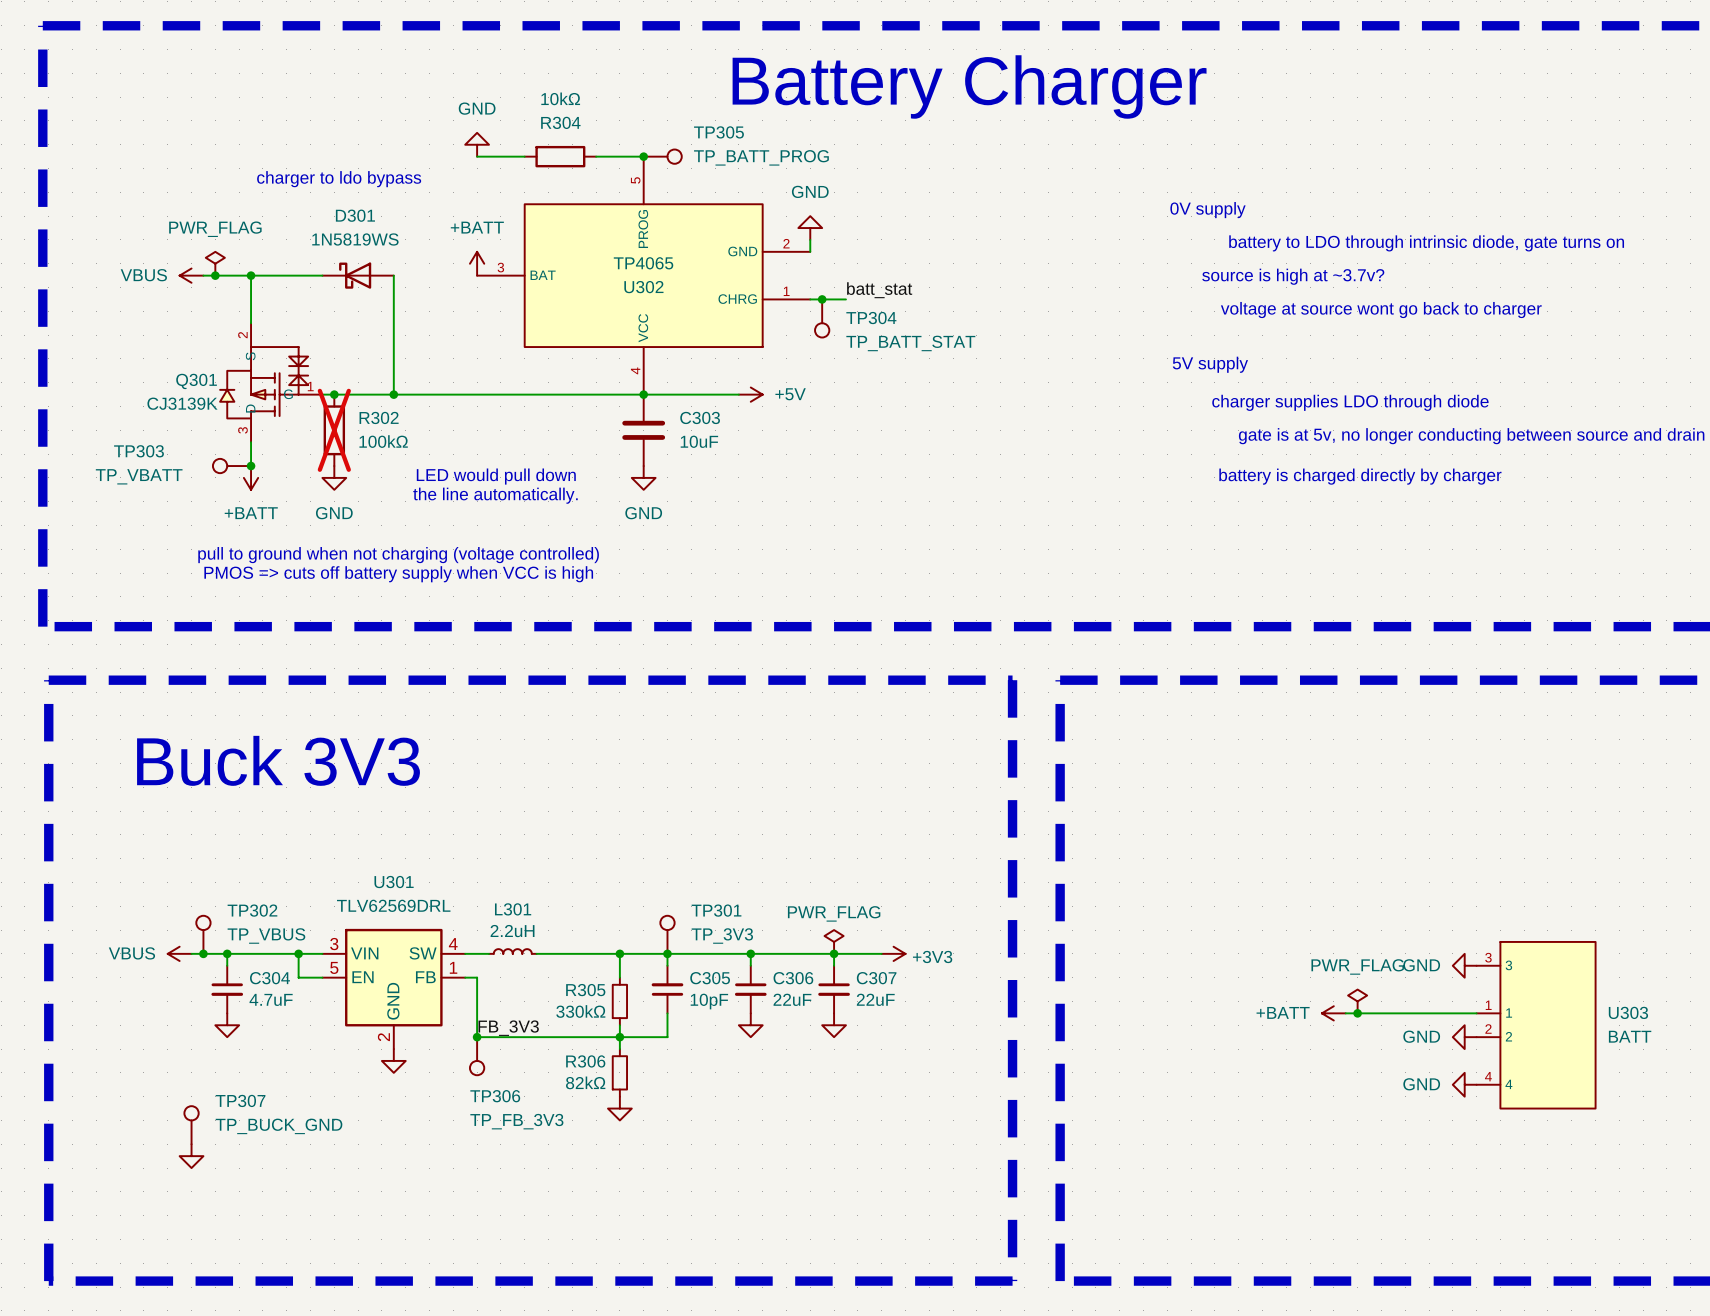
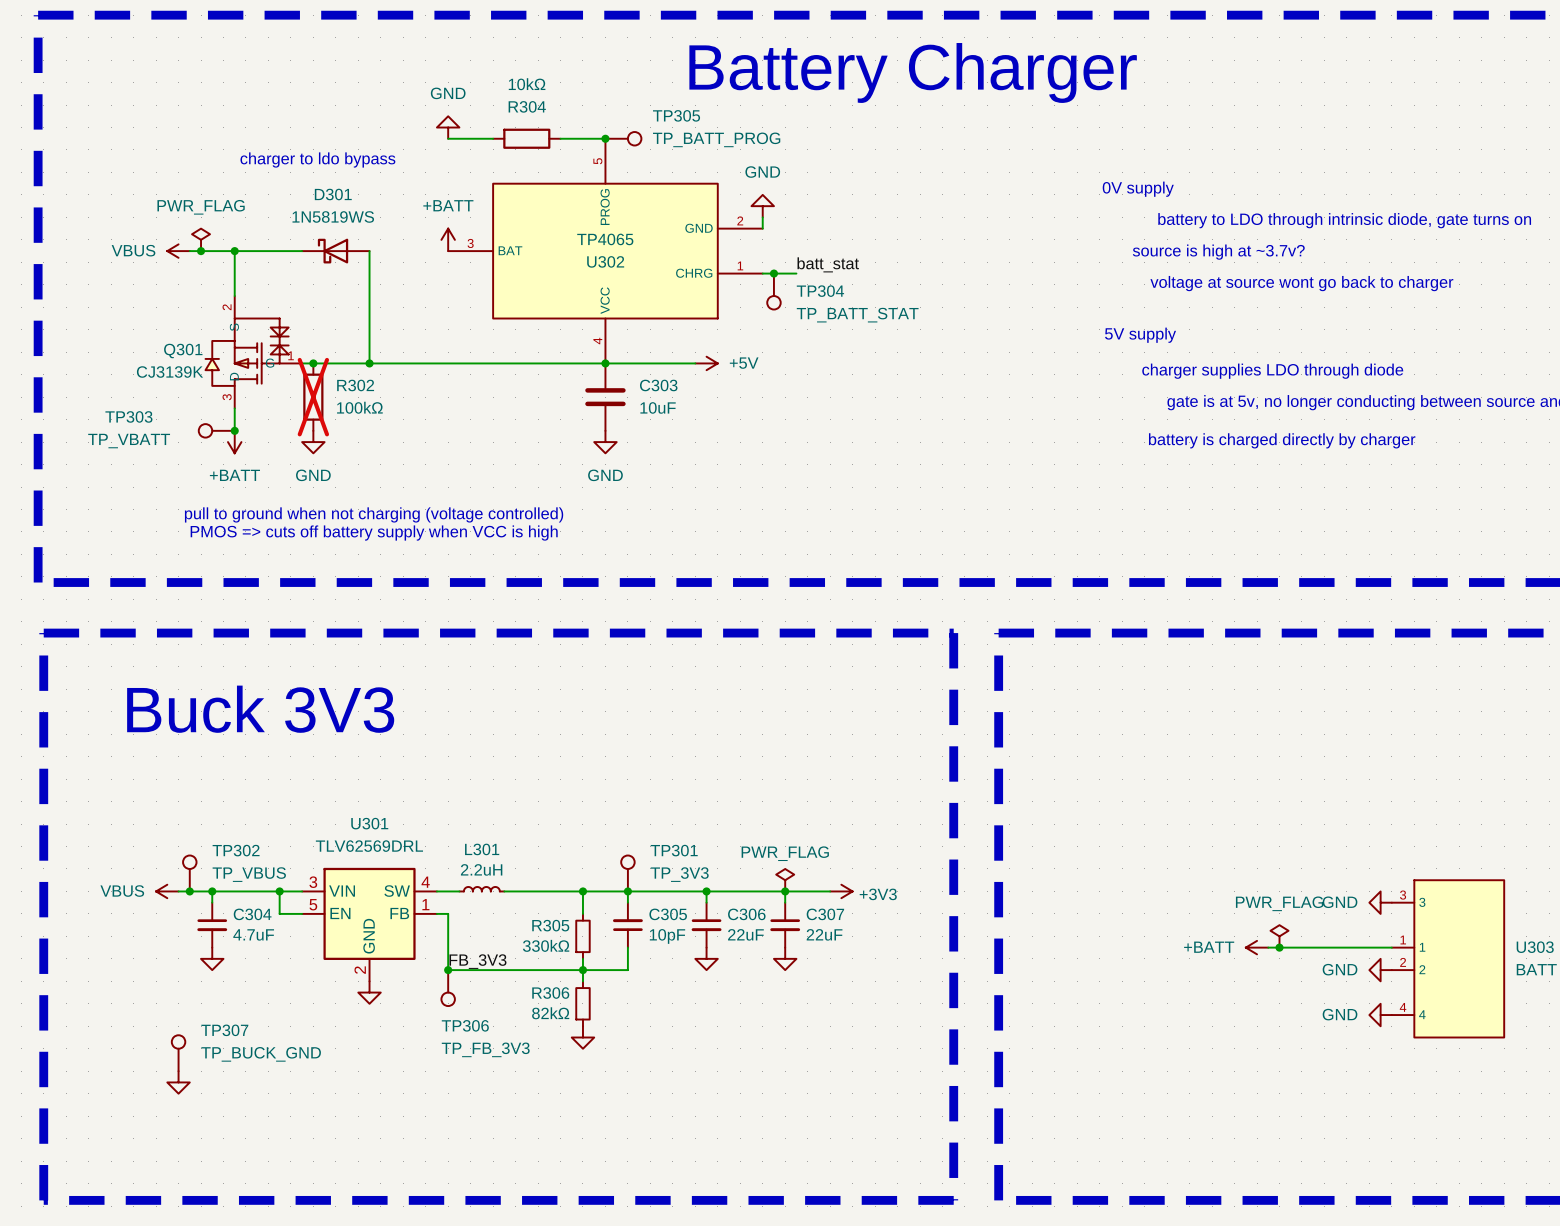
text: LED would pull down (496, 476) -> none
text: the line automatically. (495, 495) -> none

